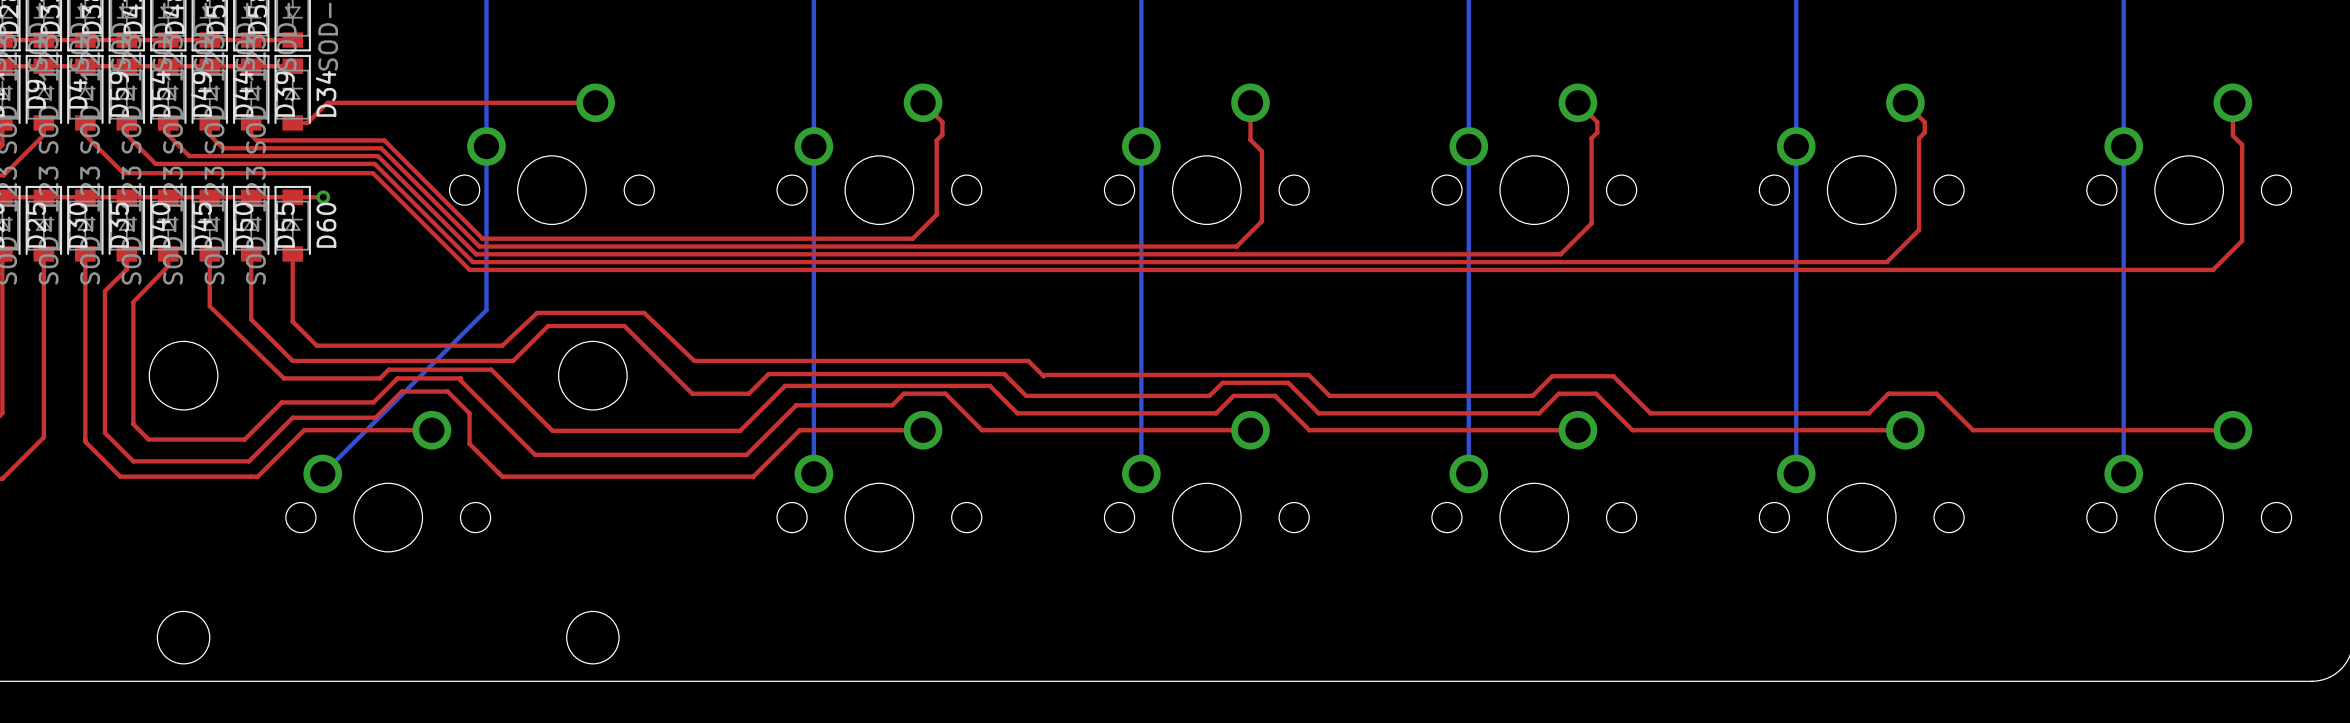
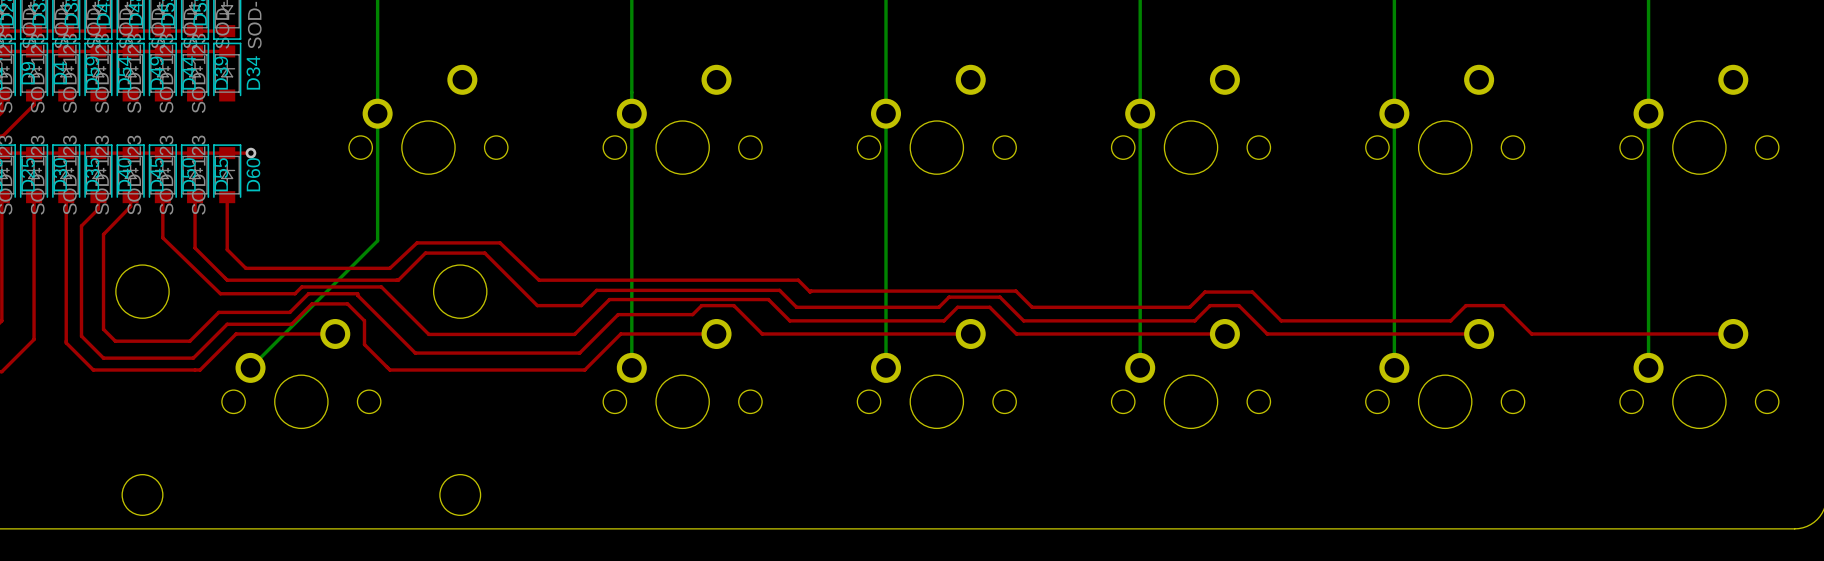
top track: (595, 102) (327, 102) (307, 122) (292, 122) -> none
top track: (923, 102) (942, 122) (942, 134) (936, 140) (936, 214) (912, 238) (482, 238) (384, 140) (256, 140) (251, 135) (251, 122) -> none
top track: (1250, 102) (1250, 139) (1261, 151) (1261, 221) (1236, 246) (479, 246) (381, 148) (222, 148) (209, 135) (209, 122) -> none
top track: (1577, 102) (1597, 122) (1597, 132) (1591, 138) (1591, 223) (1560, 254) (476, 254) (377, 156) (189, 156) (168, 135) (168, 122) -> none
top track: (1905, 102) (1924, 122) (1924, 132) (1919, 138) (1919, 229) (1886, 262) (472, 262) (374, 163) (155, 163) (126, 135) (126, 122) -> none
top track: (2232, 102) (2232, 135) (2242, 144) (2242, 240) (2213, 269) (469, 269) (372, 173) (123, 173) (85, 135) (85, 122) -> none

